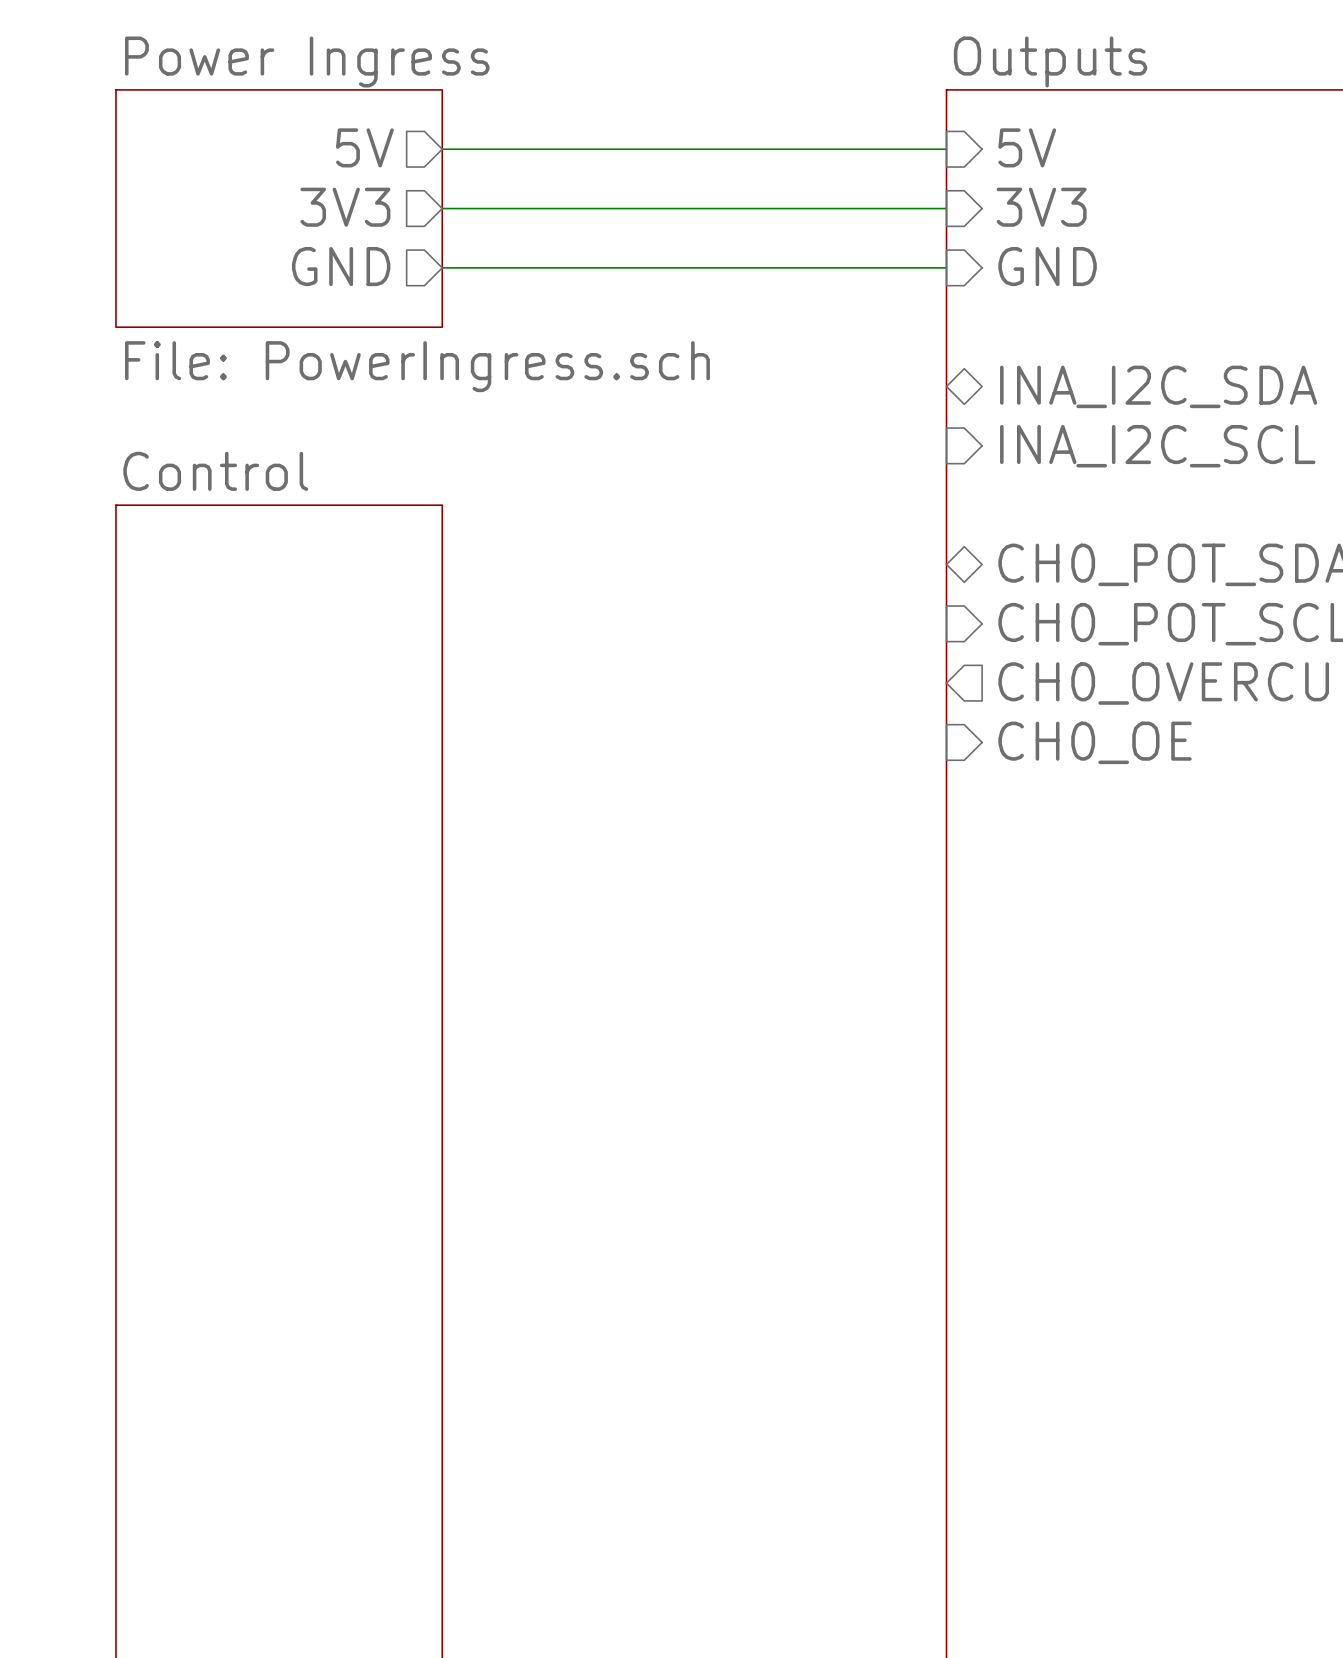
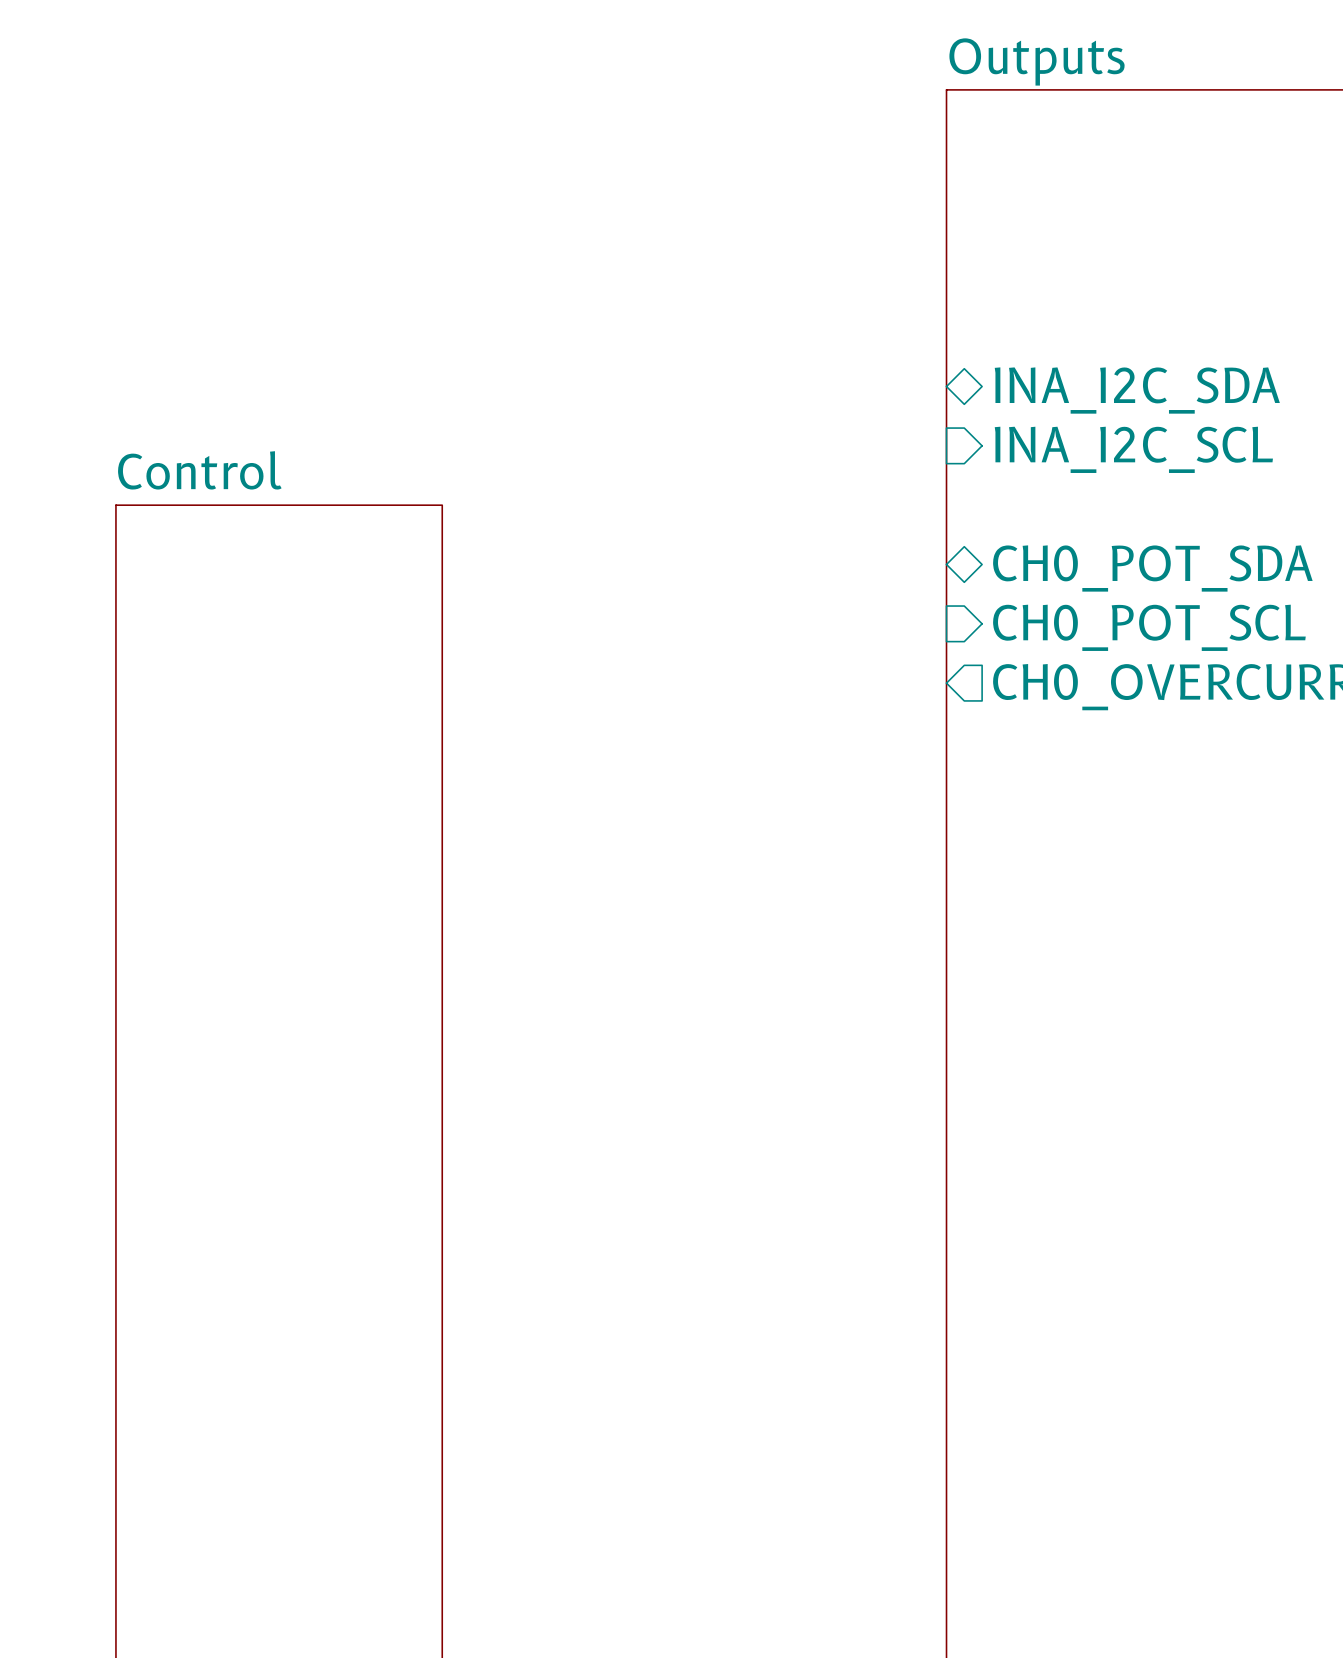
sheet pin: 5V (364, 147) -> none
sheet pin: 5V (1027, 147) -> none
wire: (442, 149) (946, 149) -> none
sheet pin: 3V3 (345, 207) -> none
sheet pin: 3V3 (1041, 207) -> none
sheet Power Ingress: File: PowerIngress.sch (279, 208) -> none
wire: (442, 208) (946, 208) -> none
sheet pin: GND (341, 266) -> none
sheet pin: GND (1047, 266) -> none
wire: (442, 267) (946, 267) -> none
sheet pin: CH0_OE (1095, 742) -> none

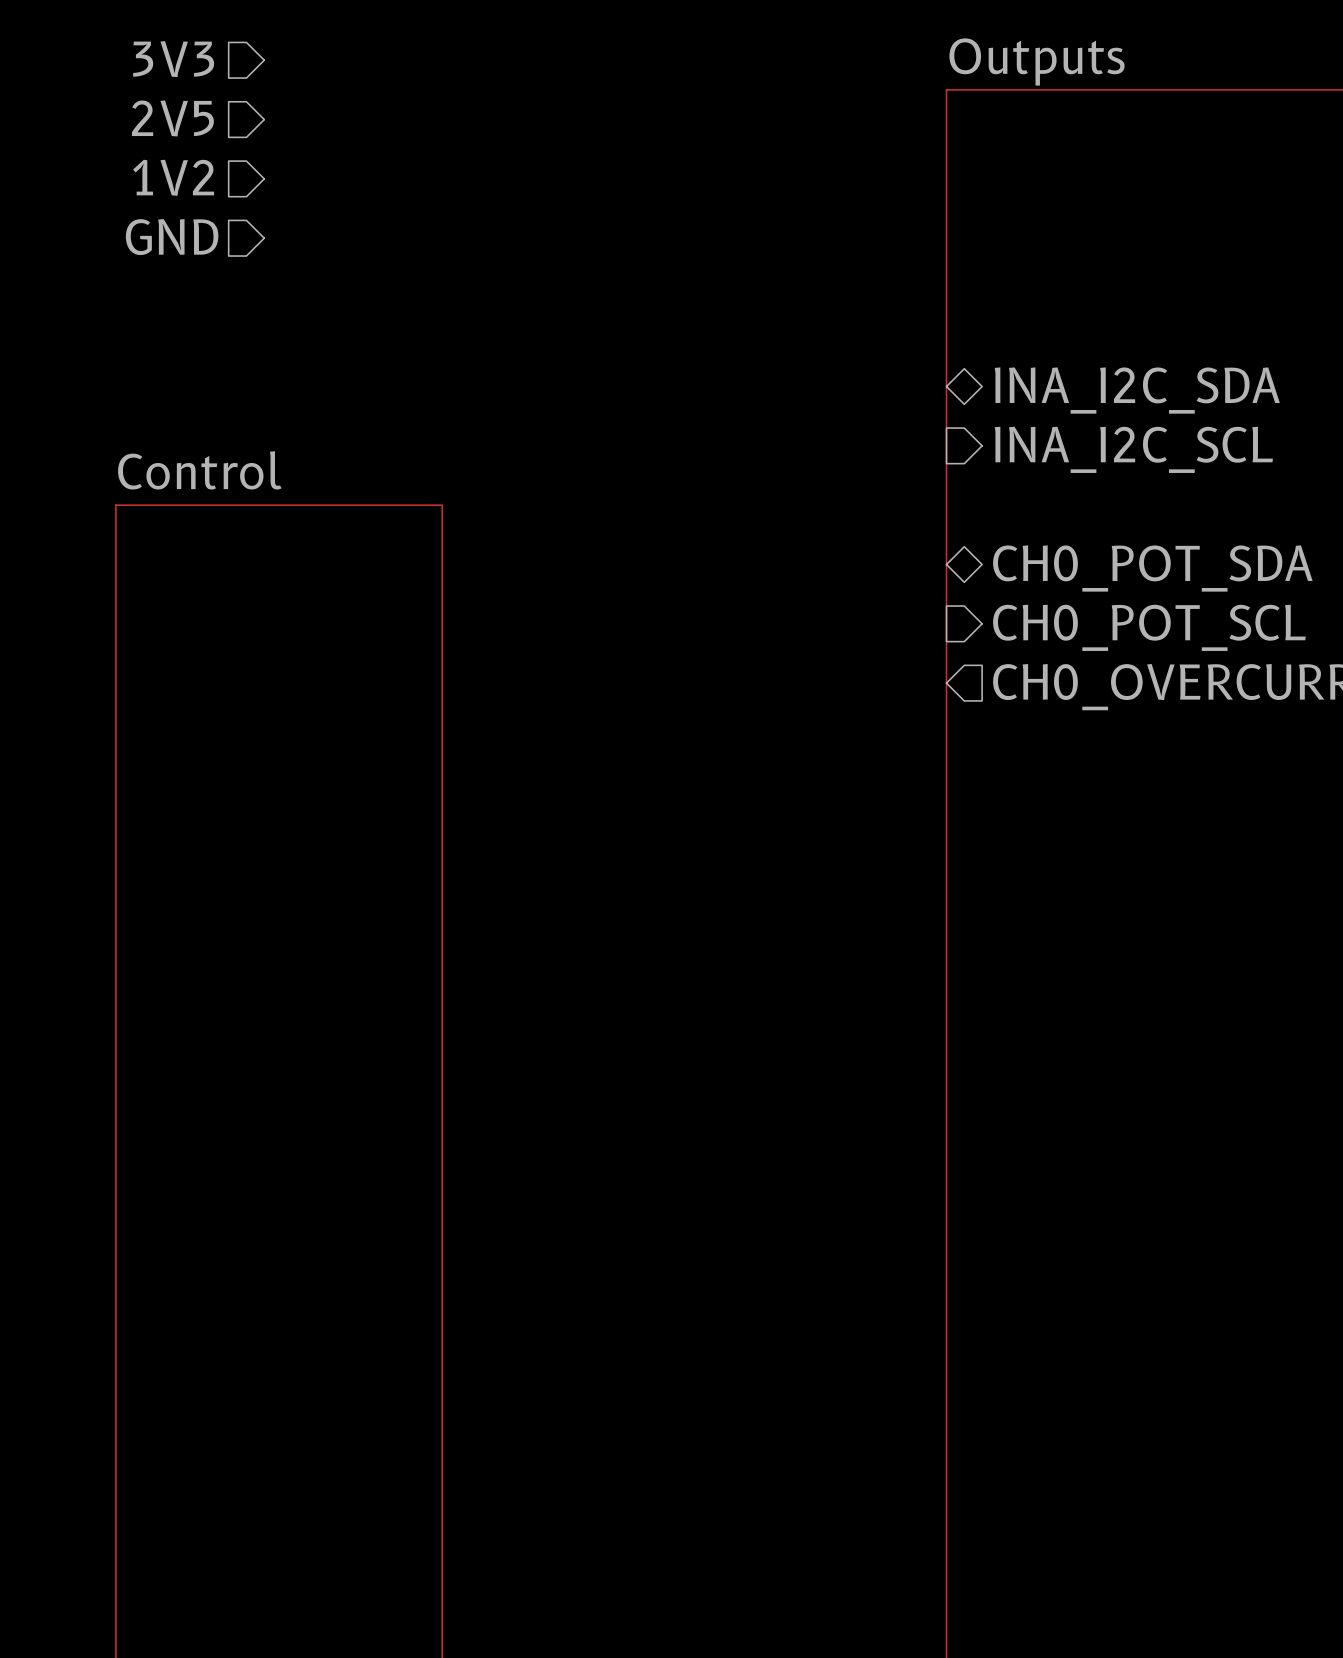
hierarchical label: none -> 3V3 (173, 59)
hierarchical label: none -> 2V5 (172, 118)
hierarchical label: none -> 1V2 (173, 177)
hierarchical label: none -> GND (172, 237)

